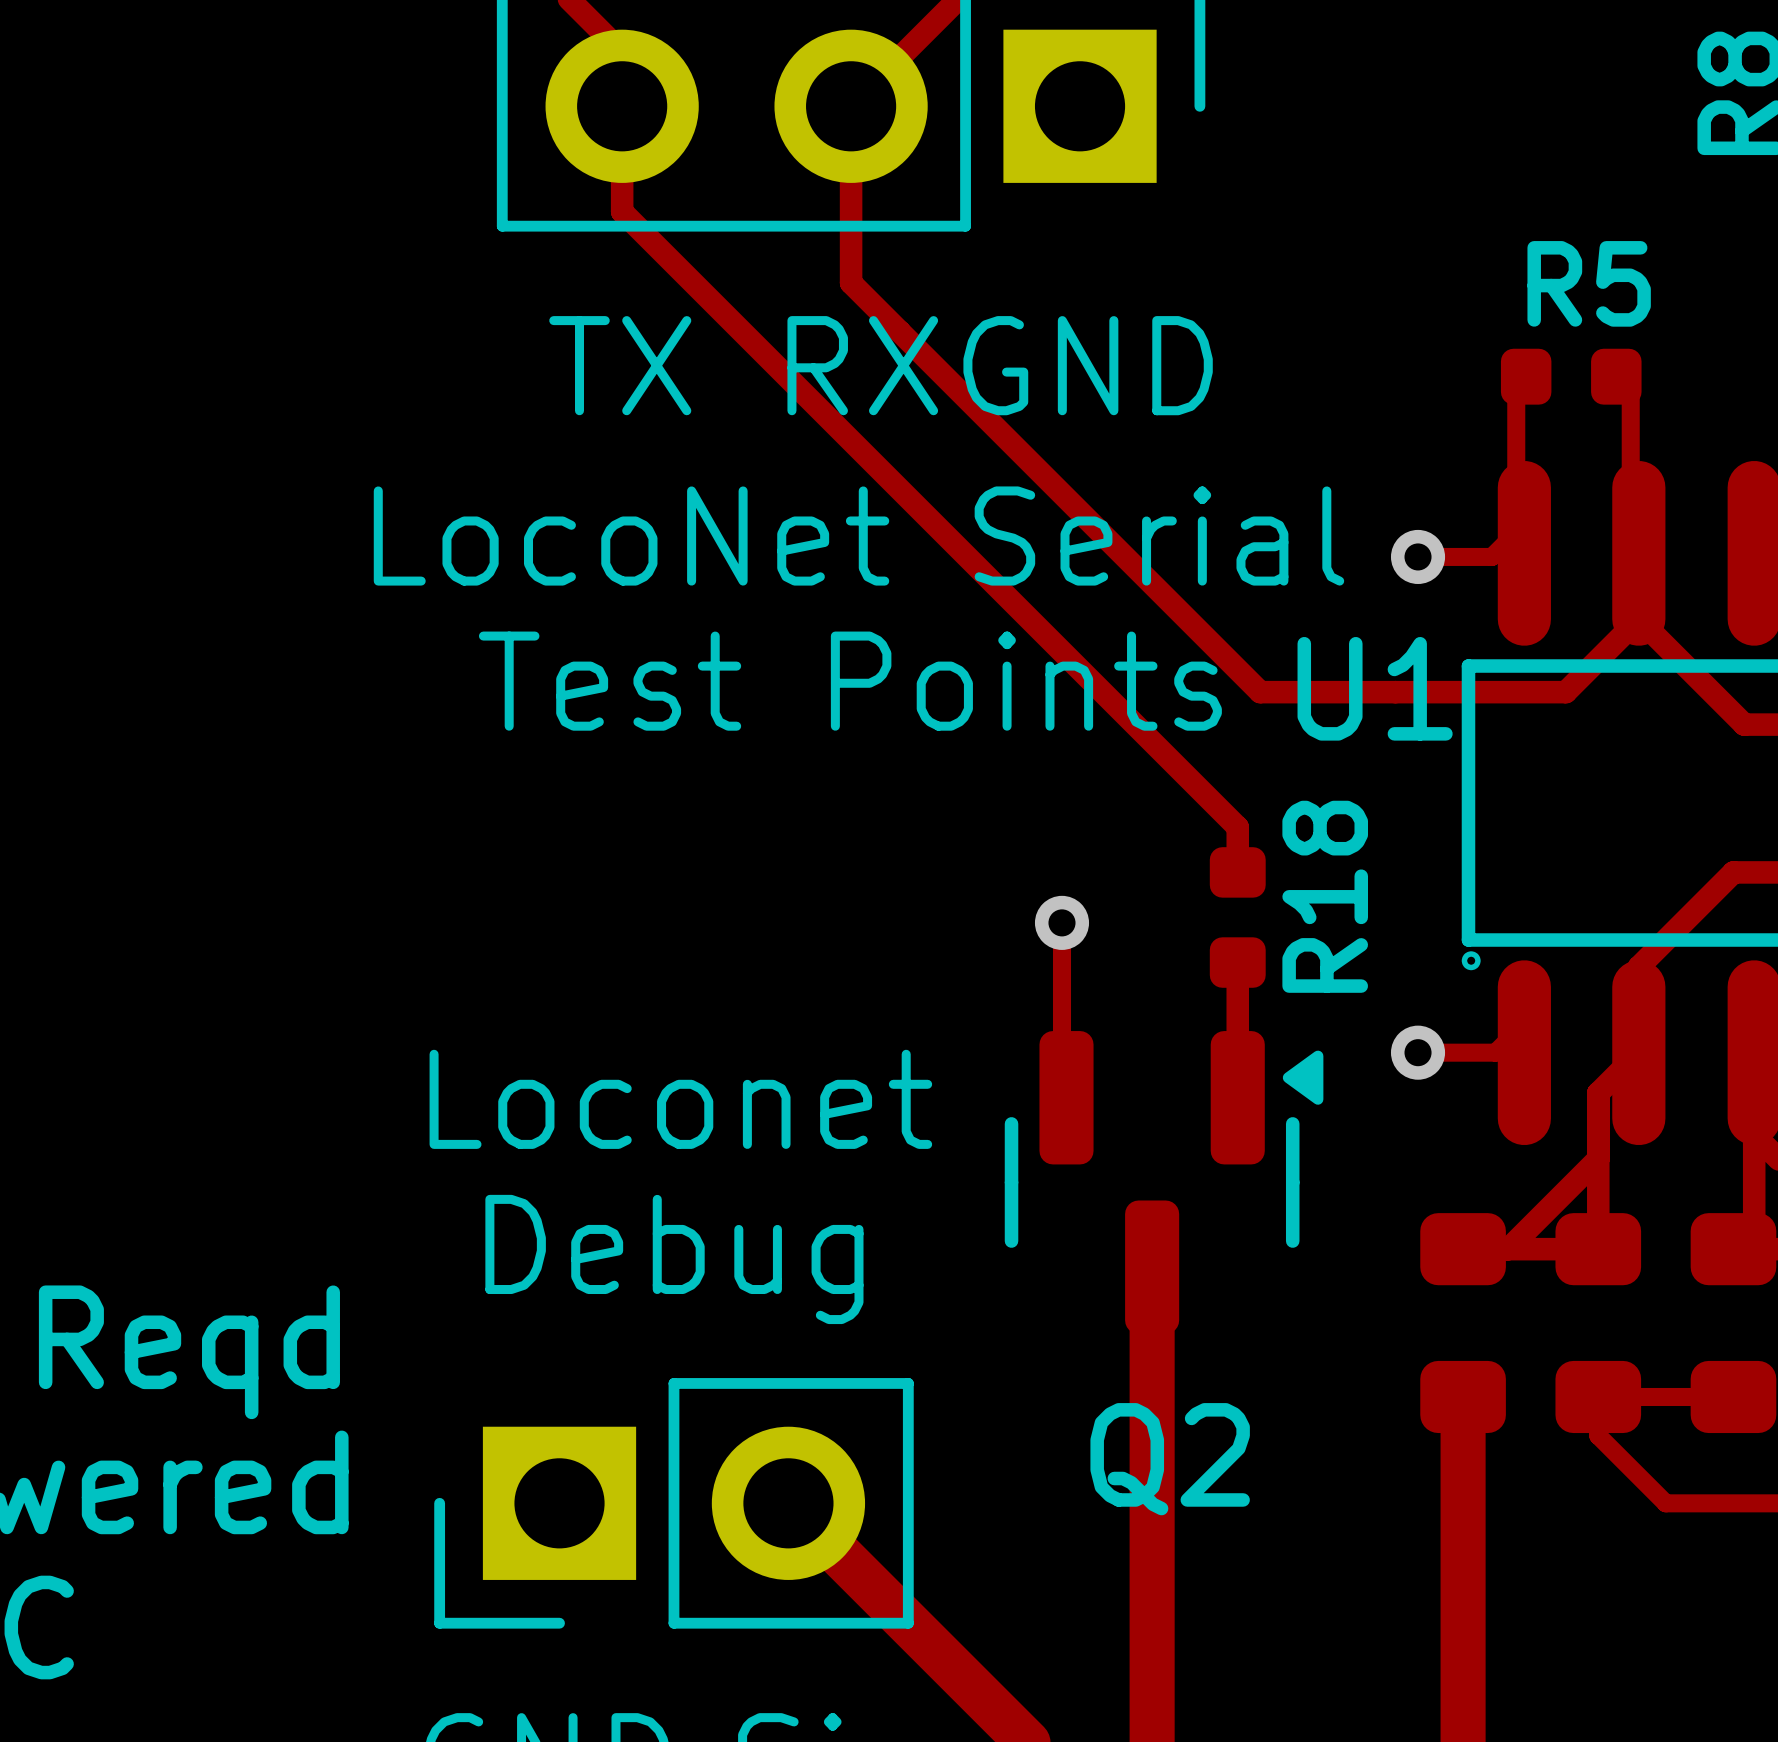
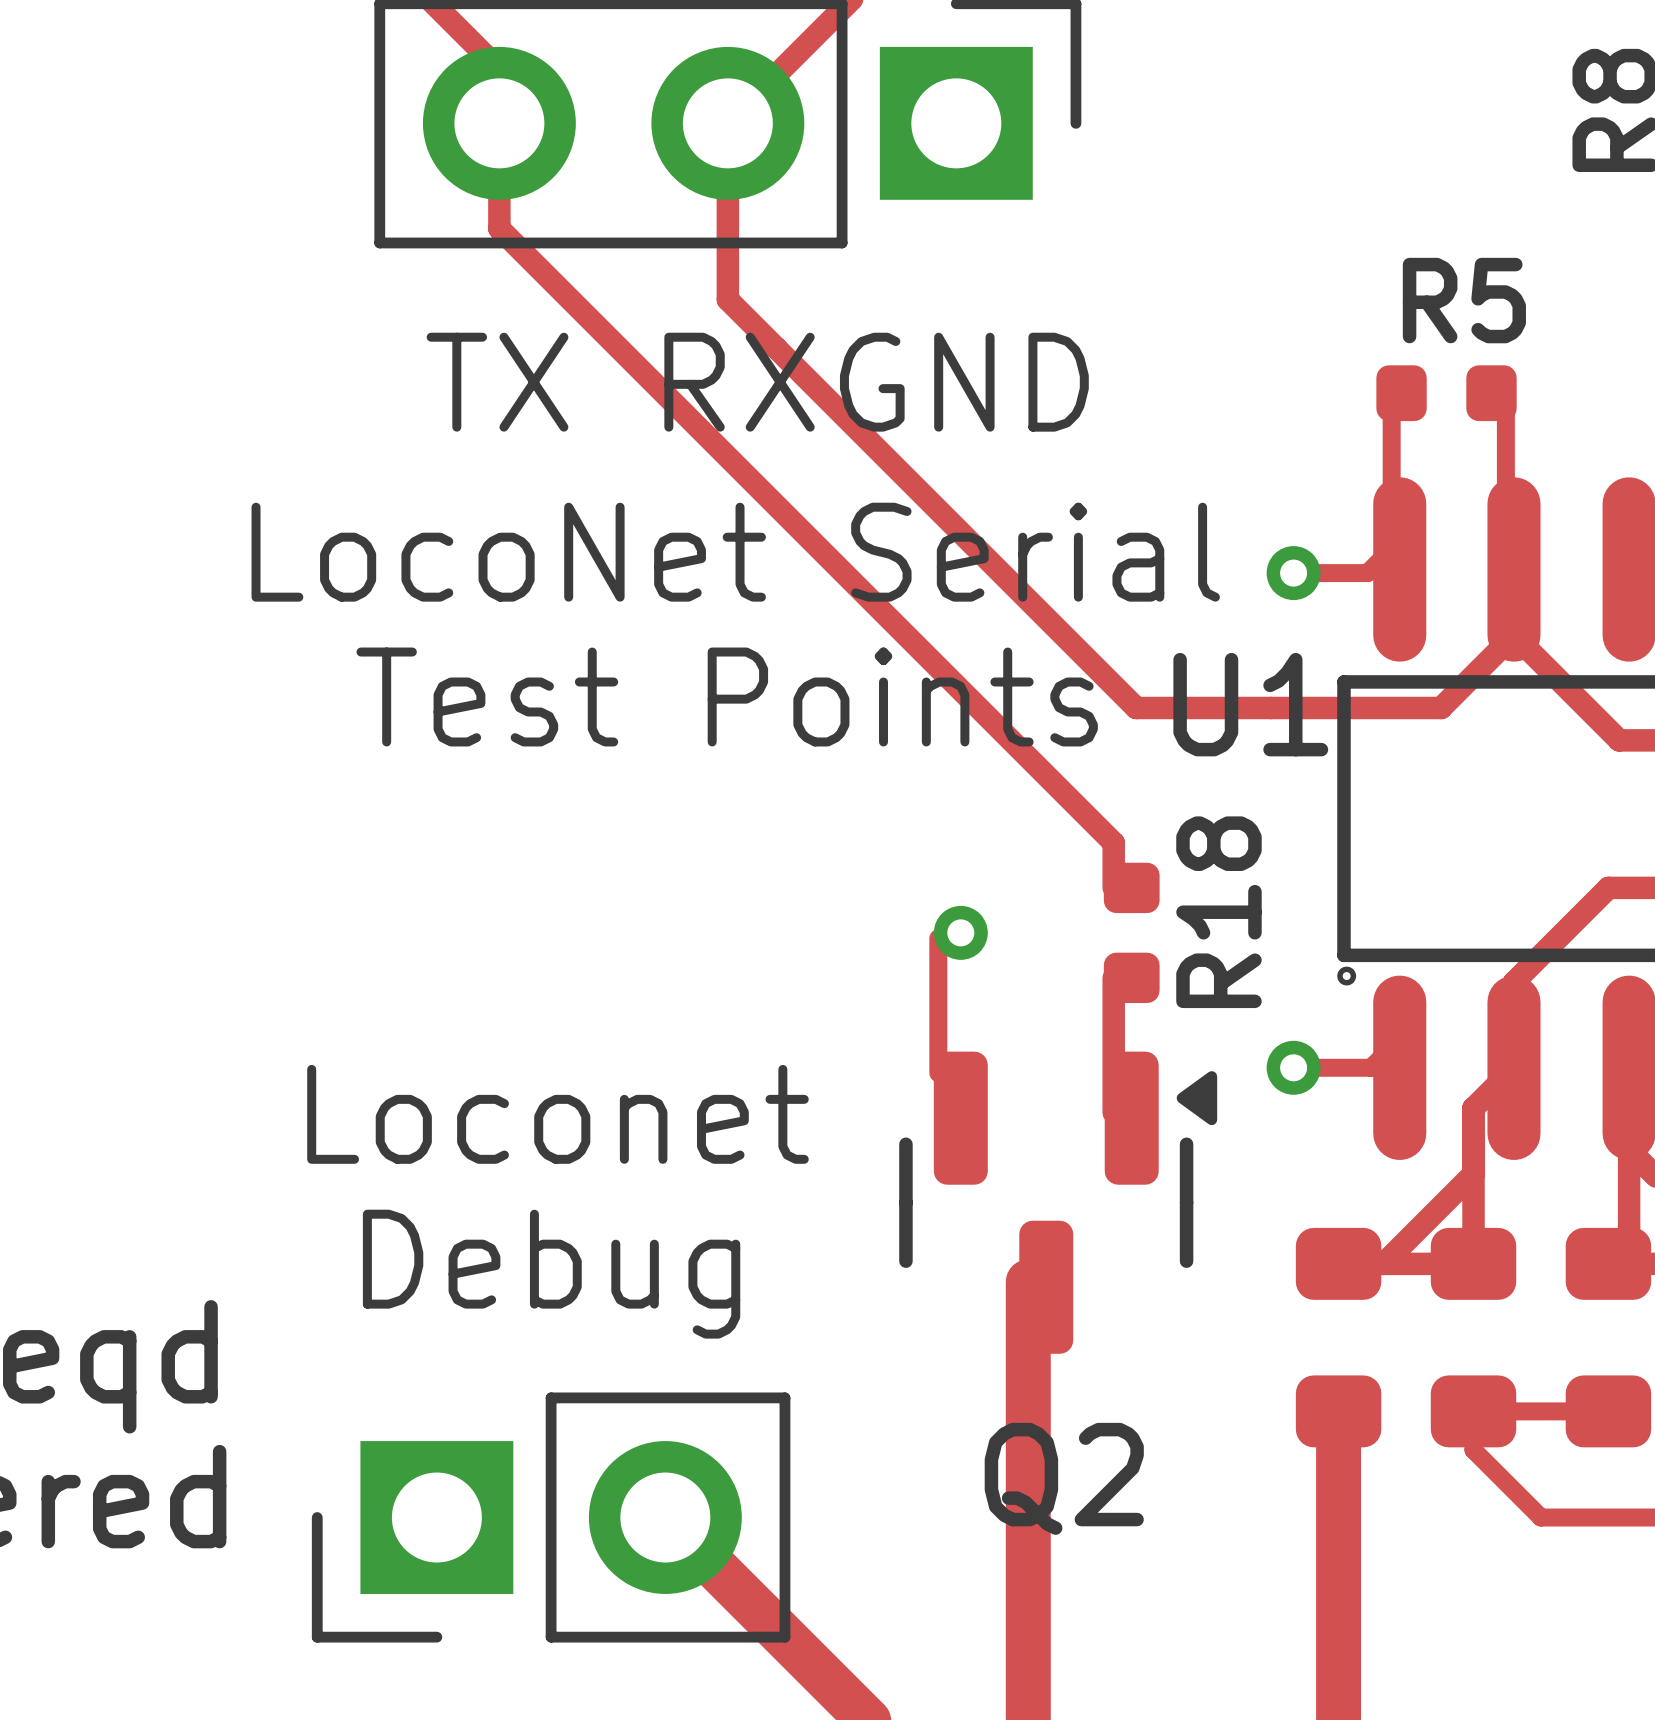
R18 position: (1237, 917) -> (1131, 932)
via position: (1062, 922) -> (960, 932)
Q2 position: (1164, 1182) -> (1058, 1202)

